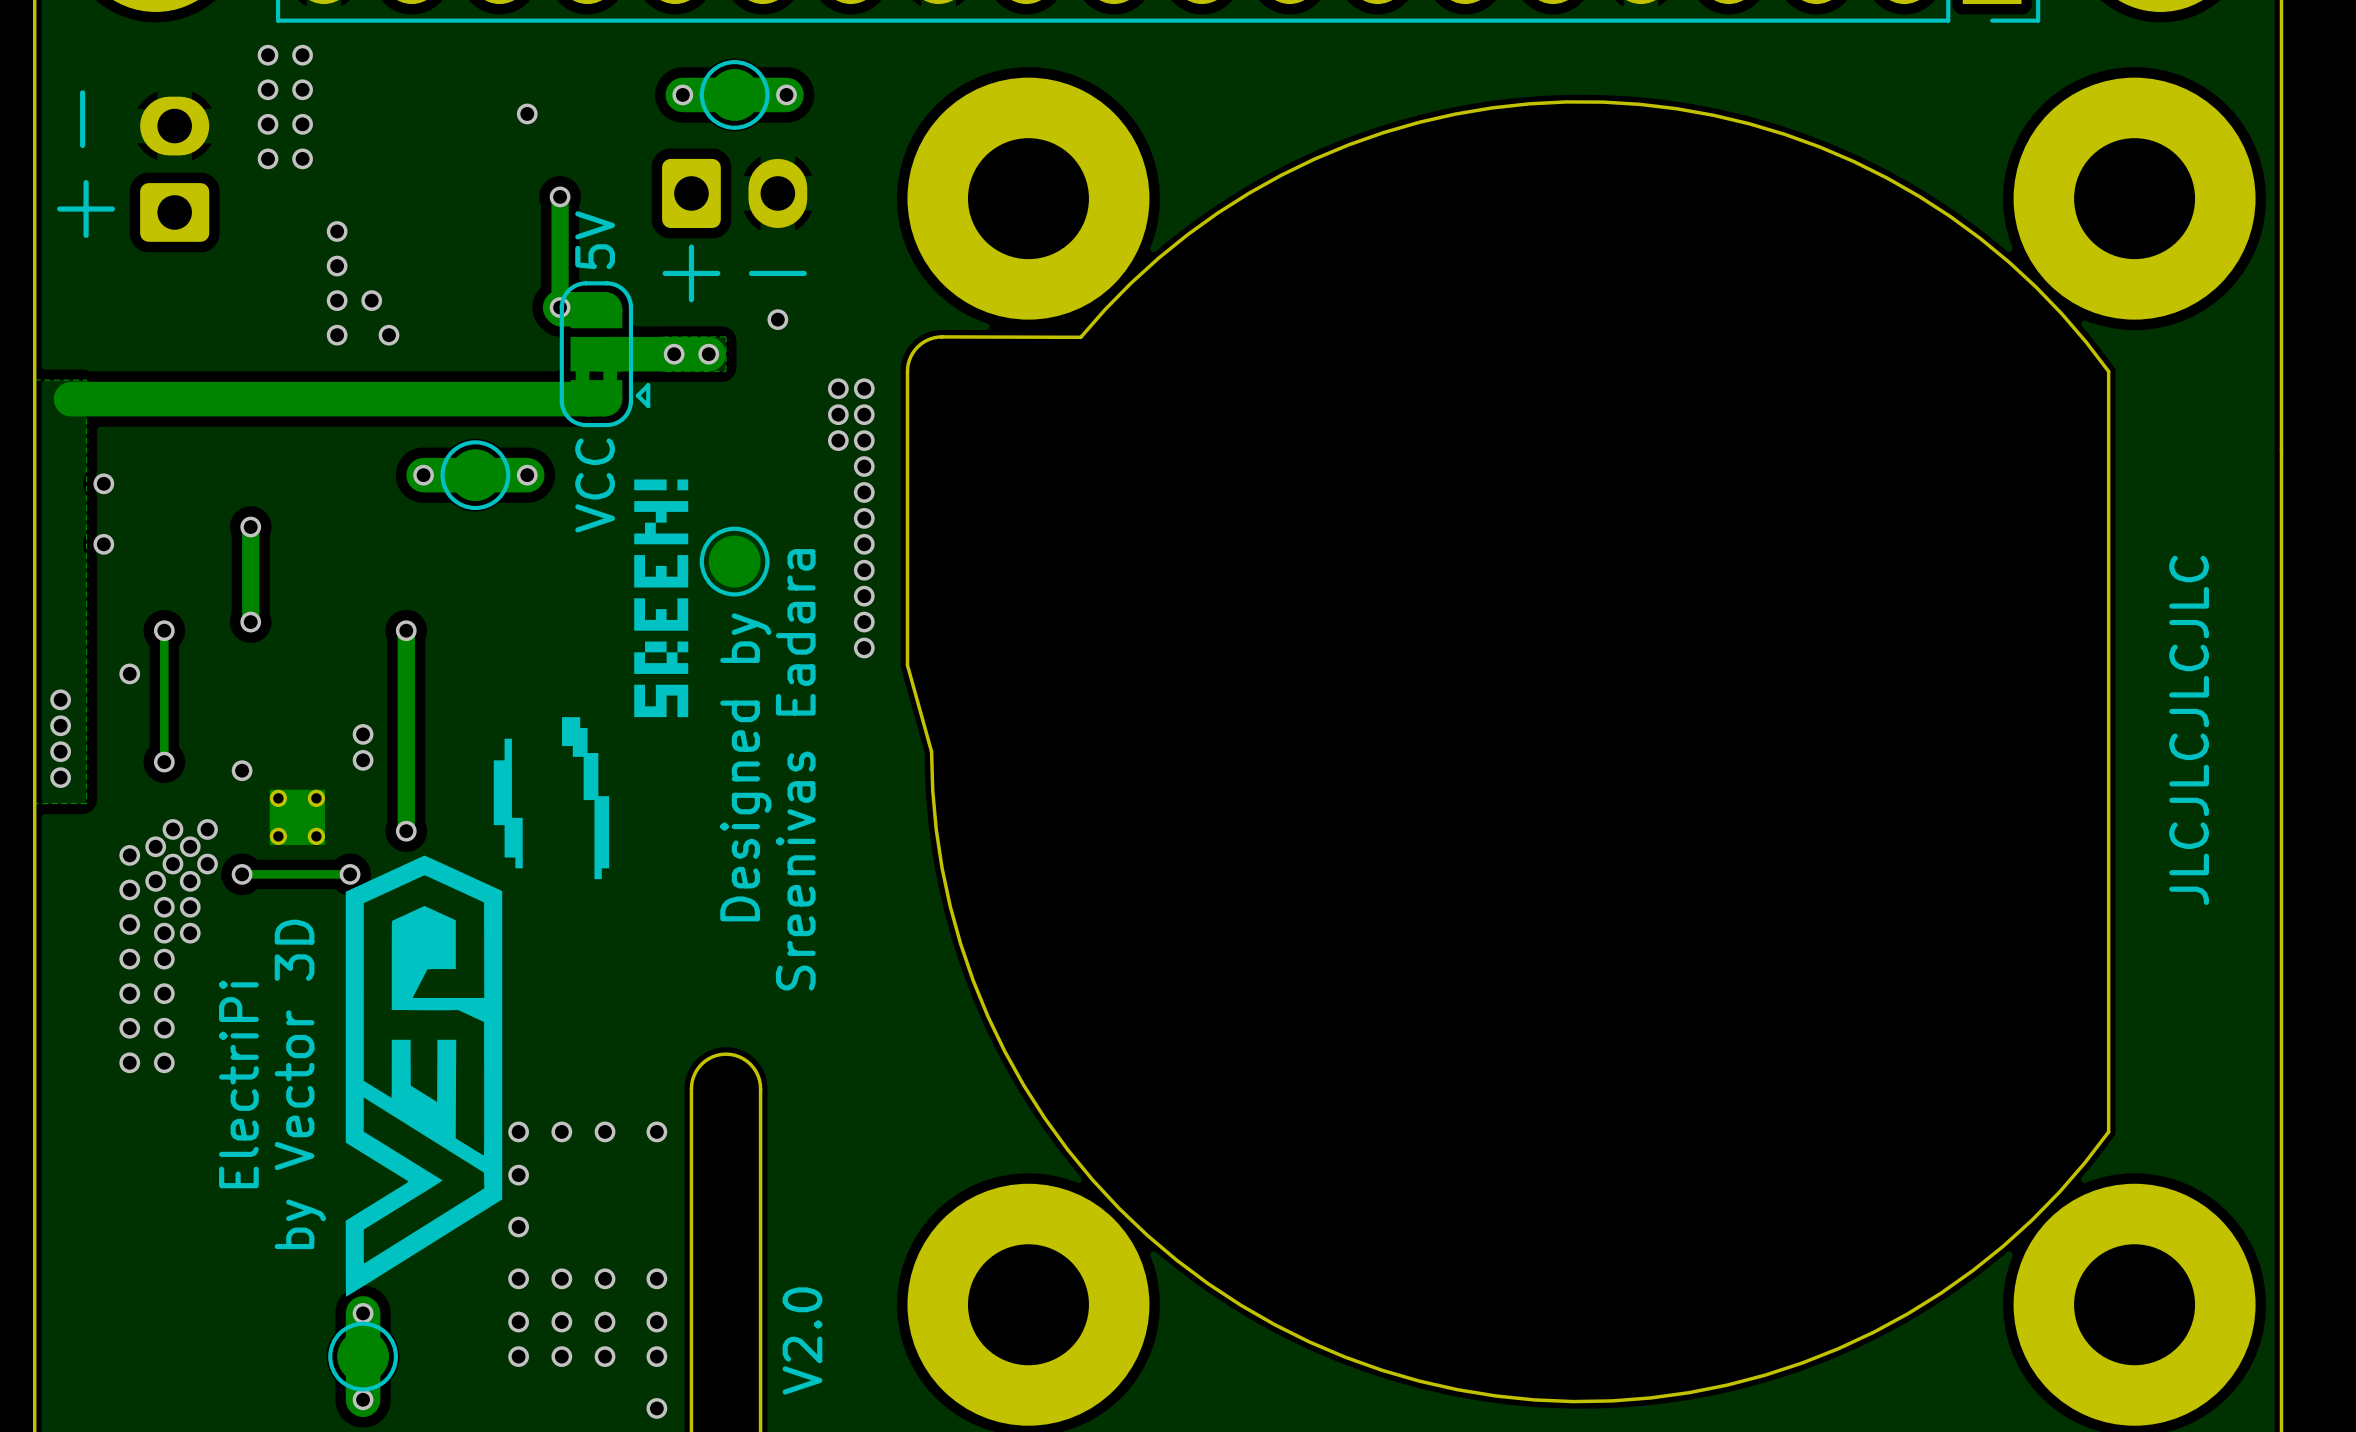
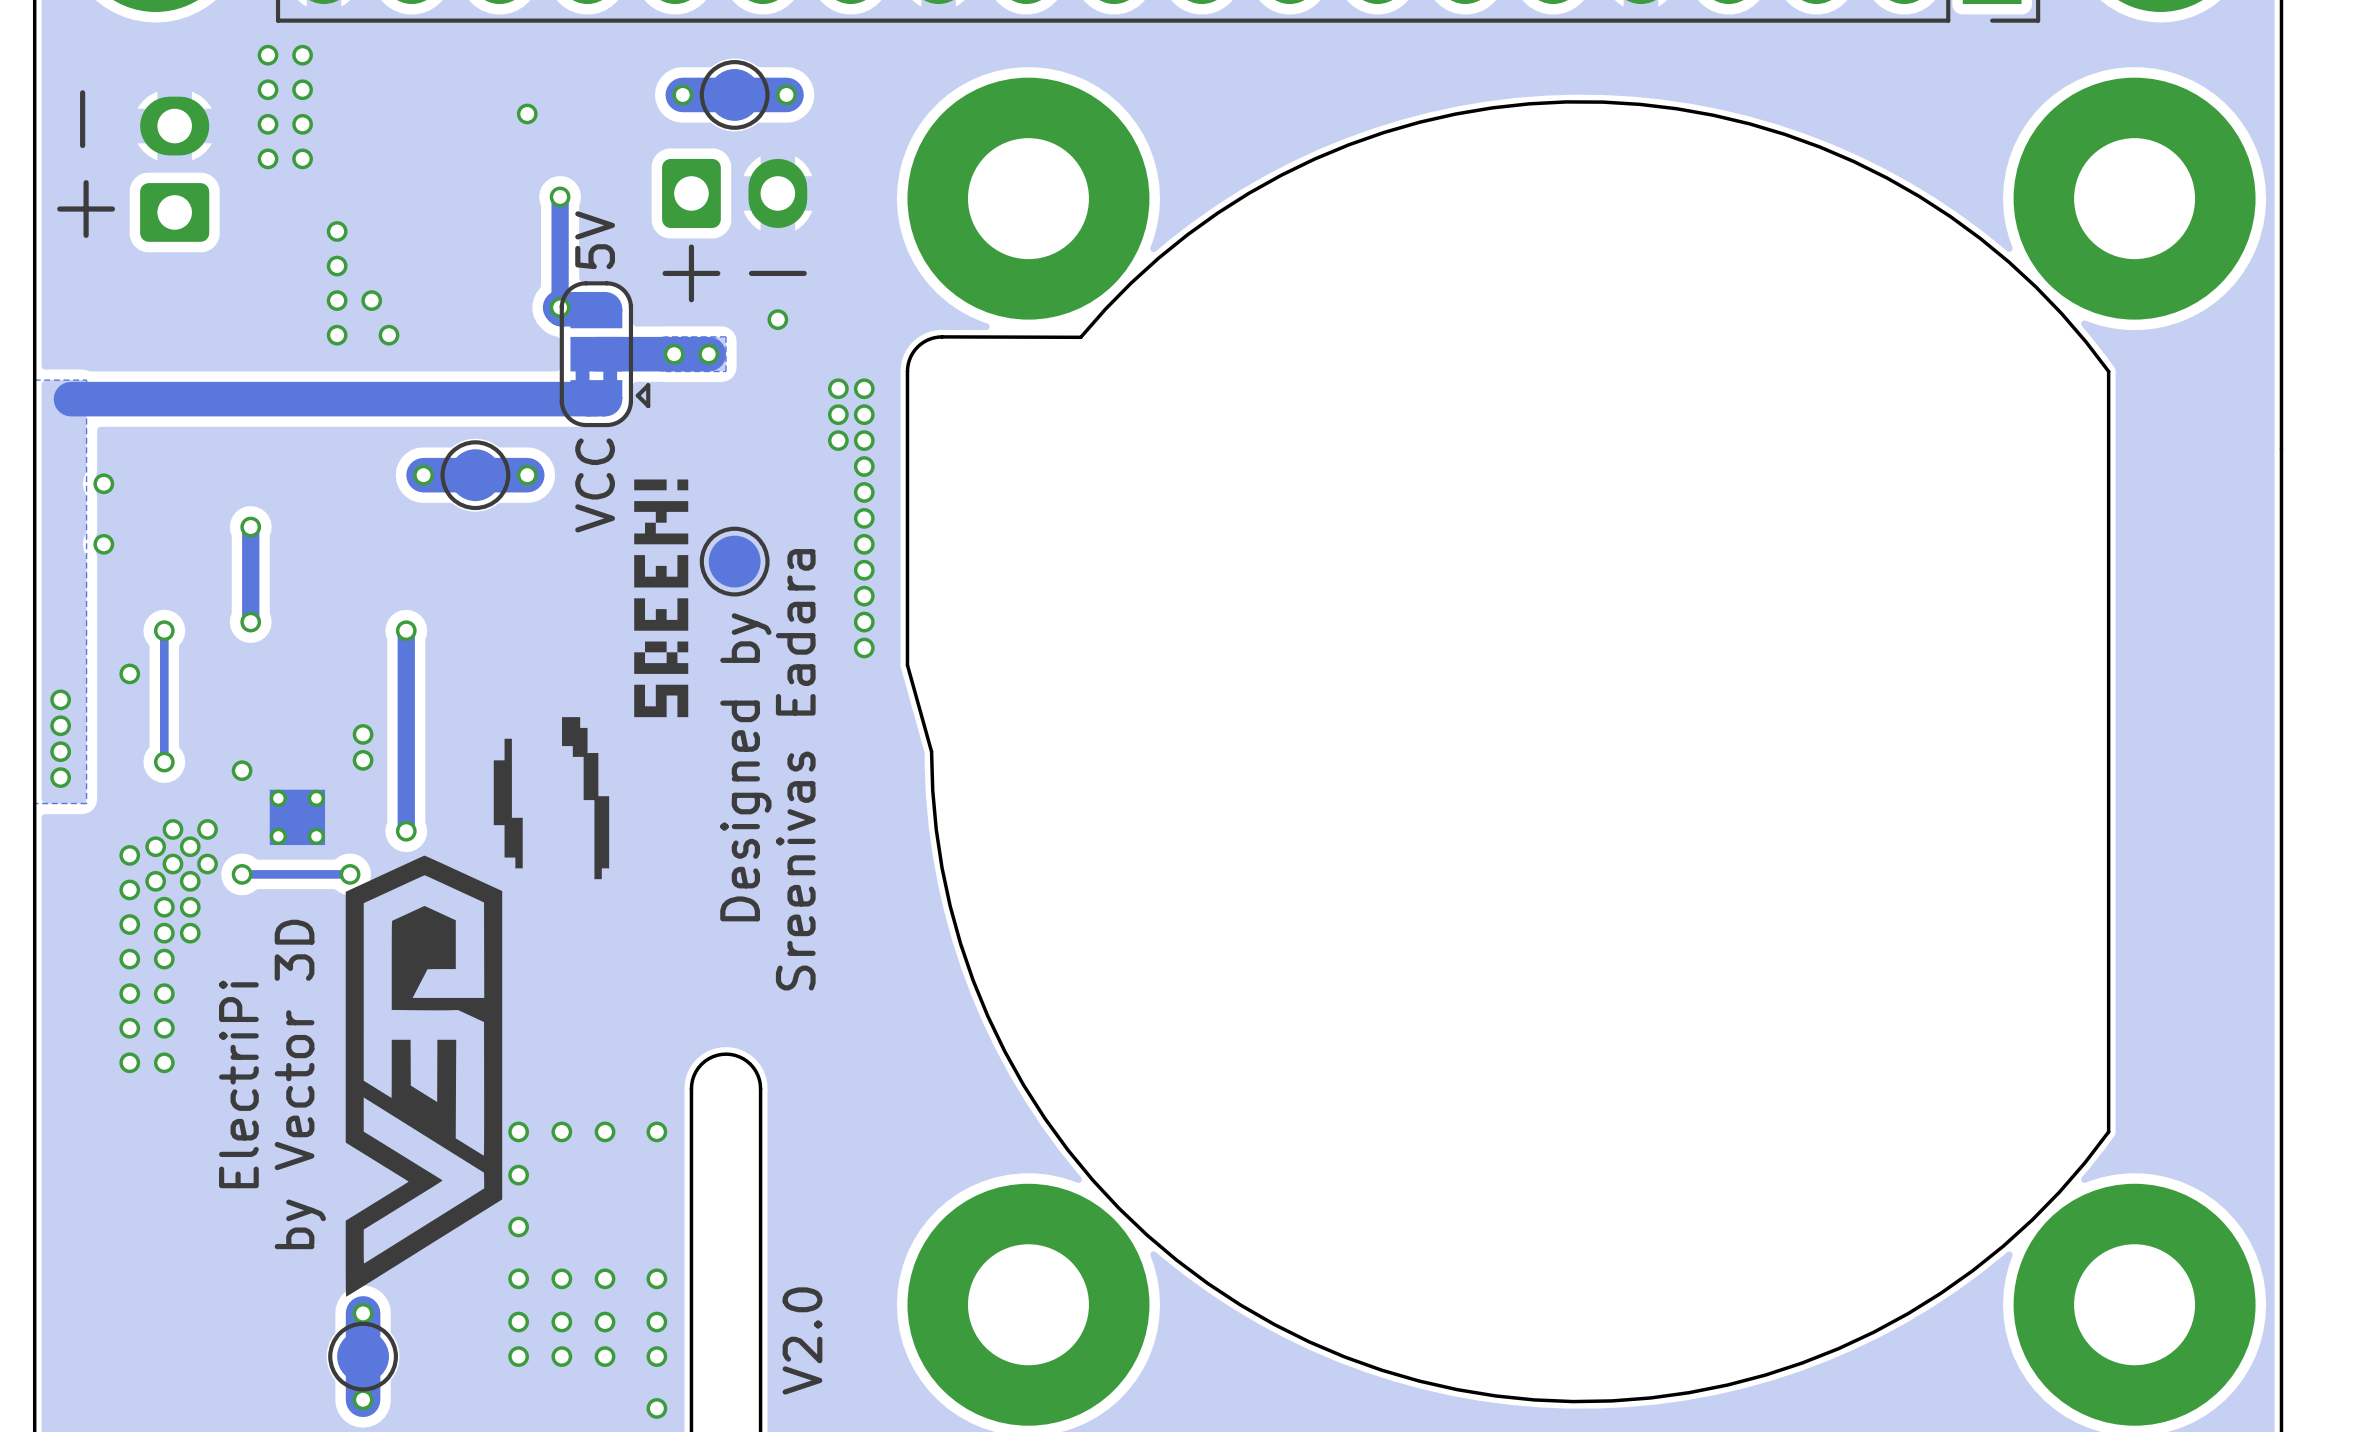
text: JLCJLCJLCJLC (2189, 730) -> none

